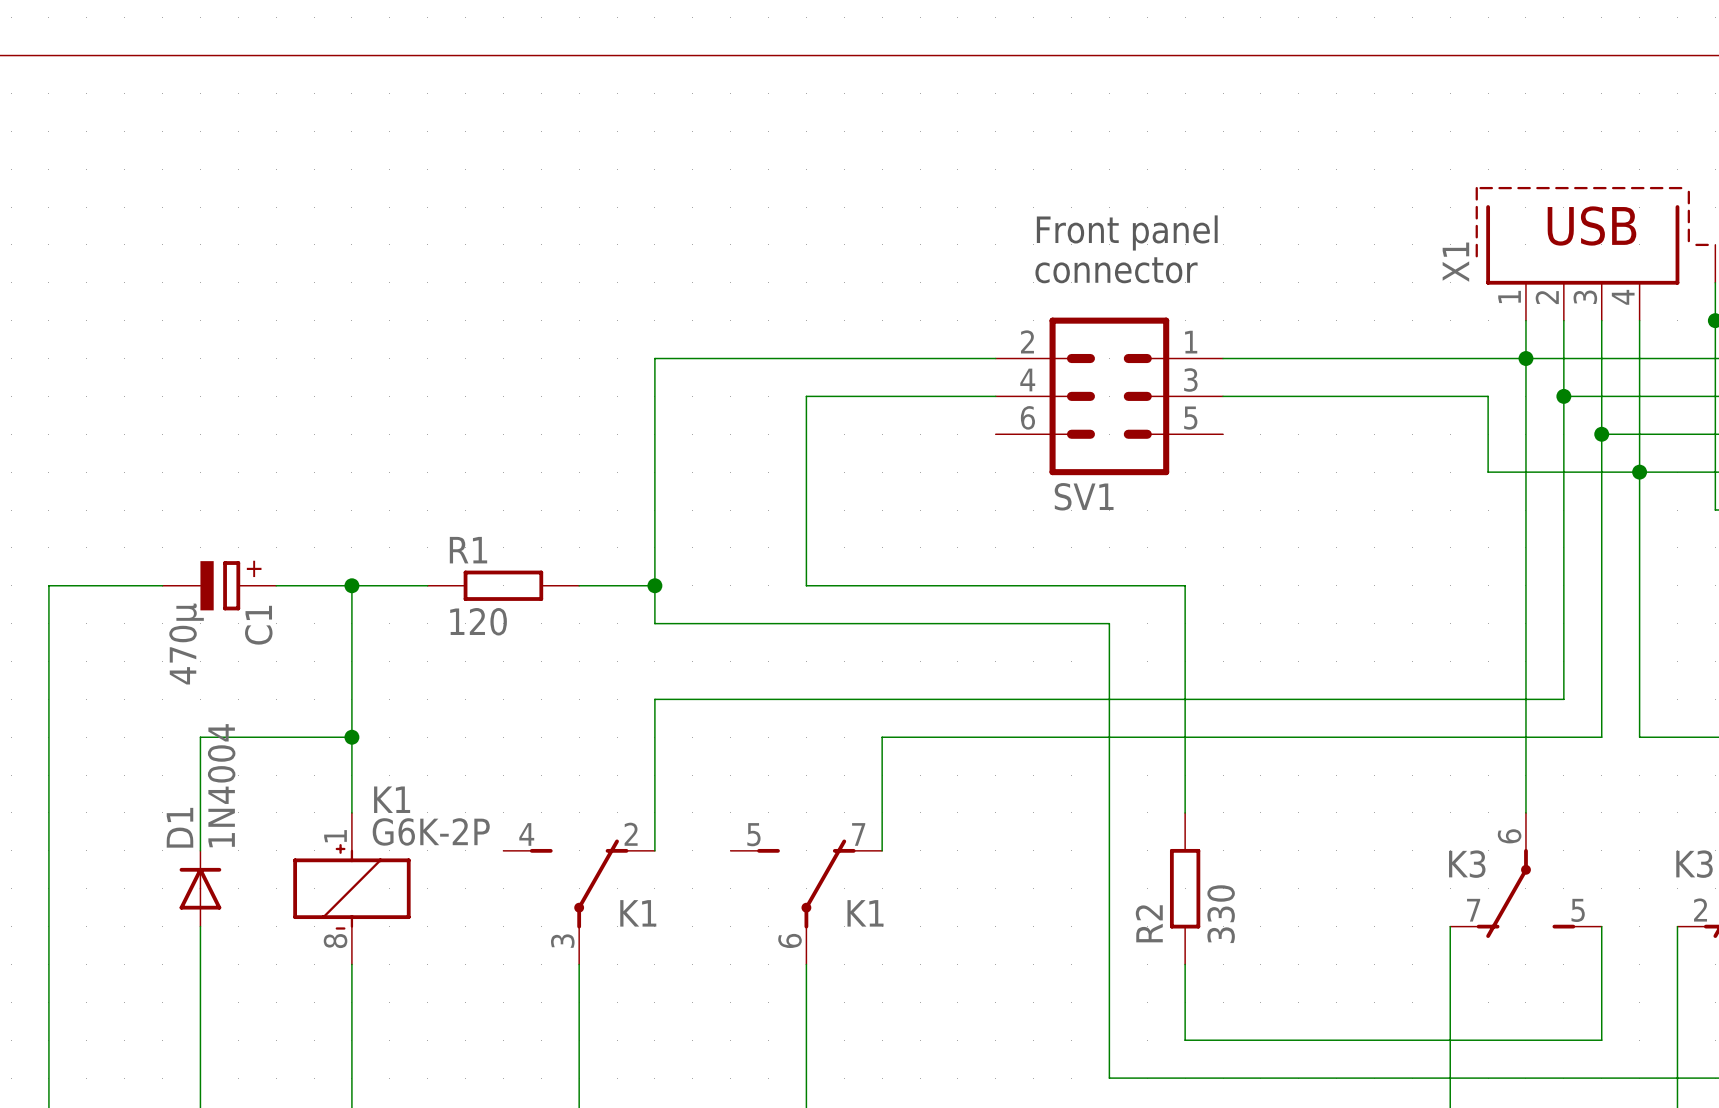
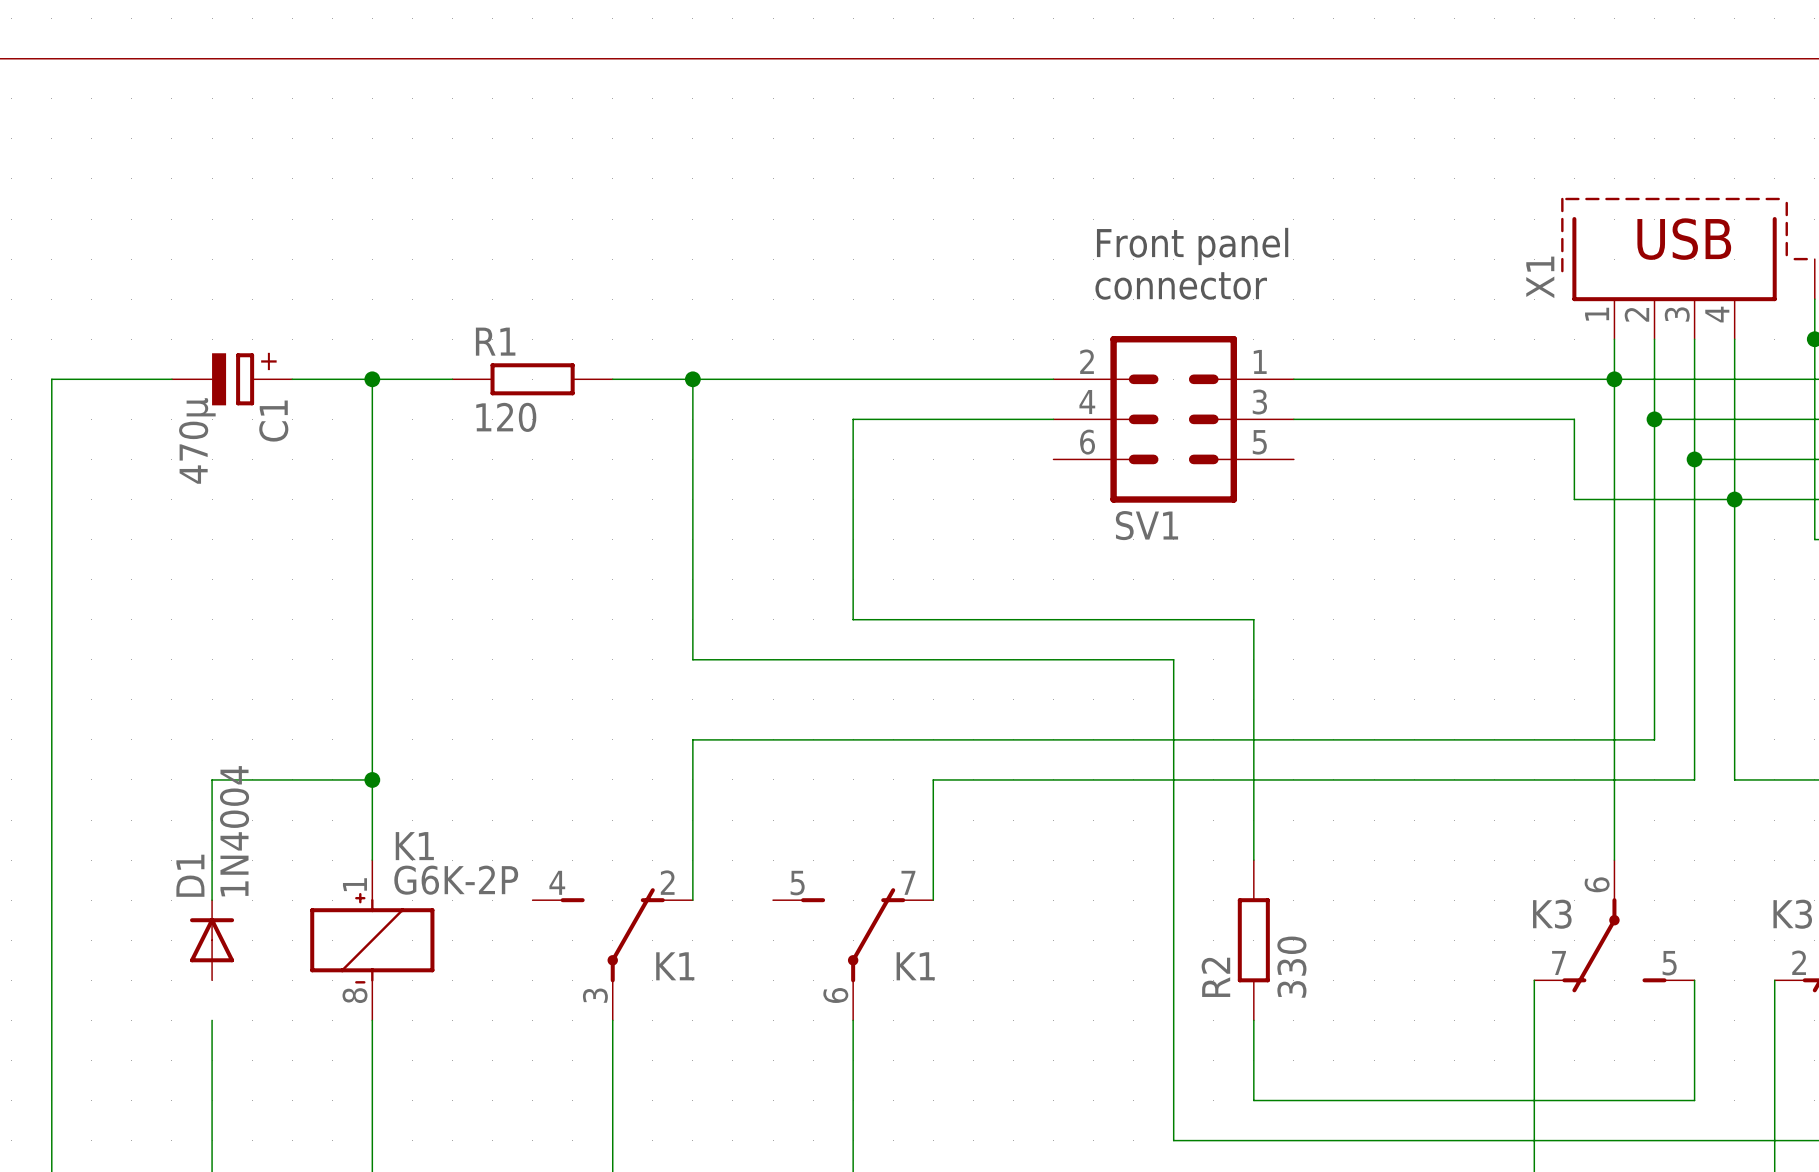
wire: none -> (372, 379) (372, 619)
junction: none -> (372, 379)
junction: none -> (692, 379)
wire: (48, 585) (162, 585) -> (51, 619) (51, 379) (171, 379)
C1 position: (219, 585) -> (232, 379)
wire: (276, 585) (427, 585) -> (292, 379) (452, 379)
junction: (351, 585) -> none
R1 position: (503, 585) -> (532, 379)
wire: (579, 585) (654, 585) -> (612, 379) (692, 379)
junction: (654, 585) -> none
wire: (200, 926) (200, 964) -> none

